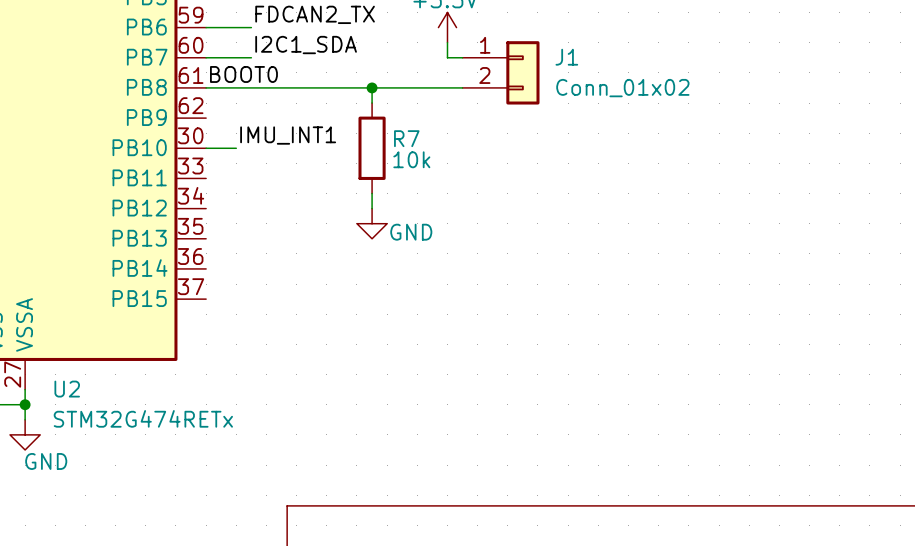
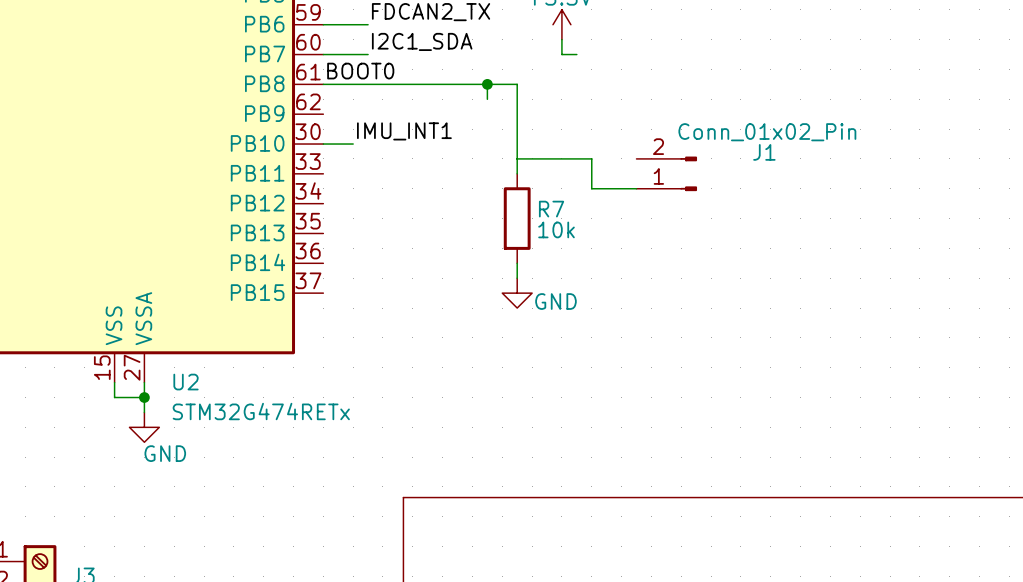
J1 symbol: [462, 41, 540, 105] -> [636, 156, 698, 192]
J1 name position: J1 (566, 57) -> J1 (764, 152)
wire: (402, 87) (462, 87) -> (517, 84) (517, 173)
J1 value: Conn_01x02 (622, 88) -> Conn_01x02_Pin (767, 132)
R7 position: (372, 148) -> (517, 218)
wire: none -> (517, 158) (591, 158) (591, 188) (636, 188)
wire: (372, 193) (372, 208) -> (517, 263) (517, 278)
power symbol position: GND (372, 223) -> GND (517, 293)

